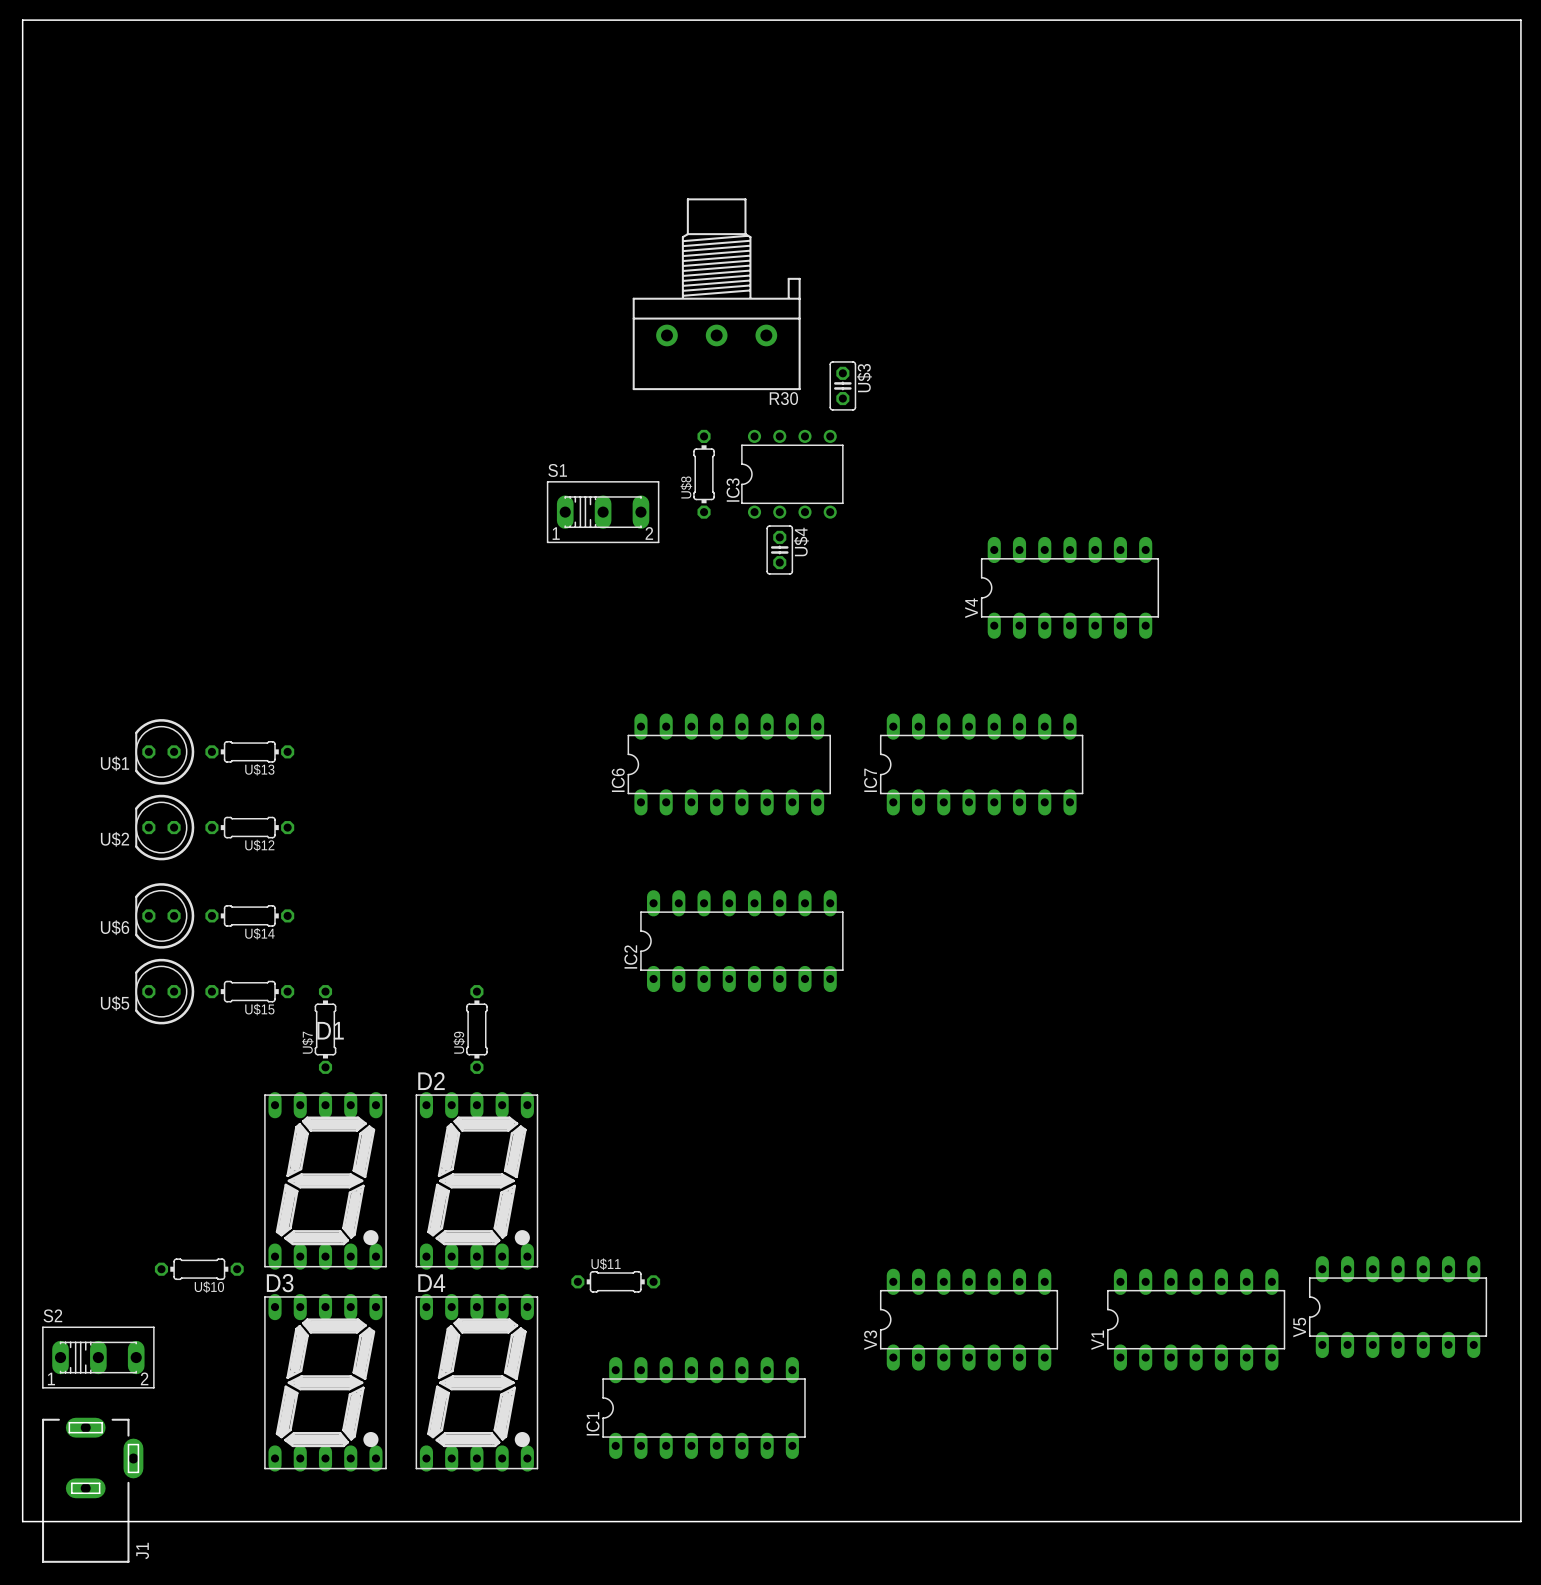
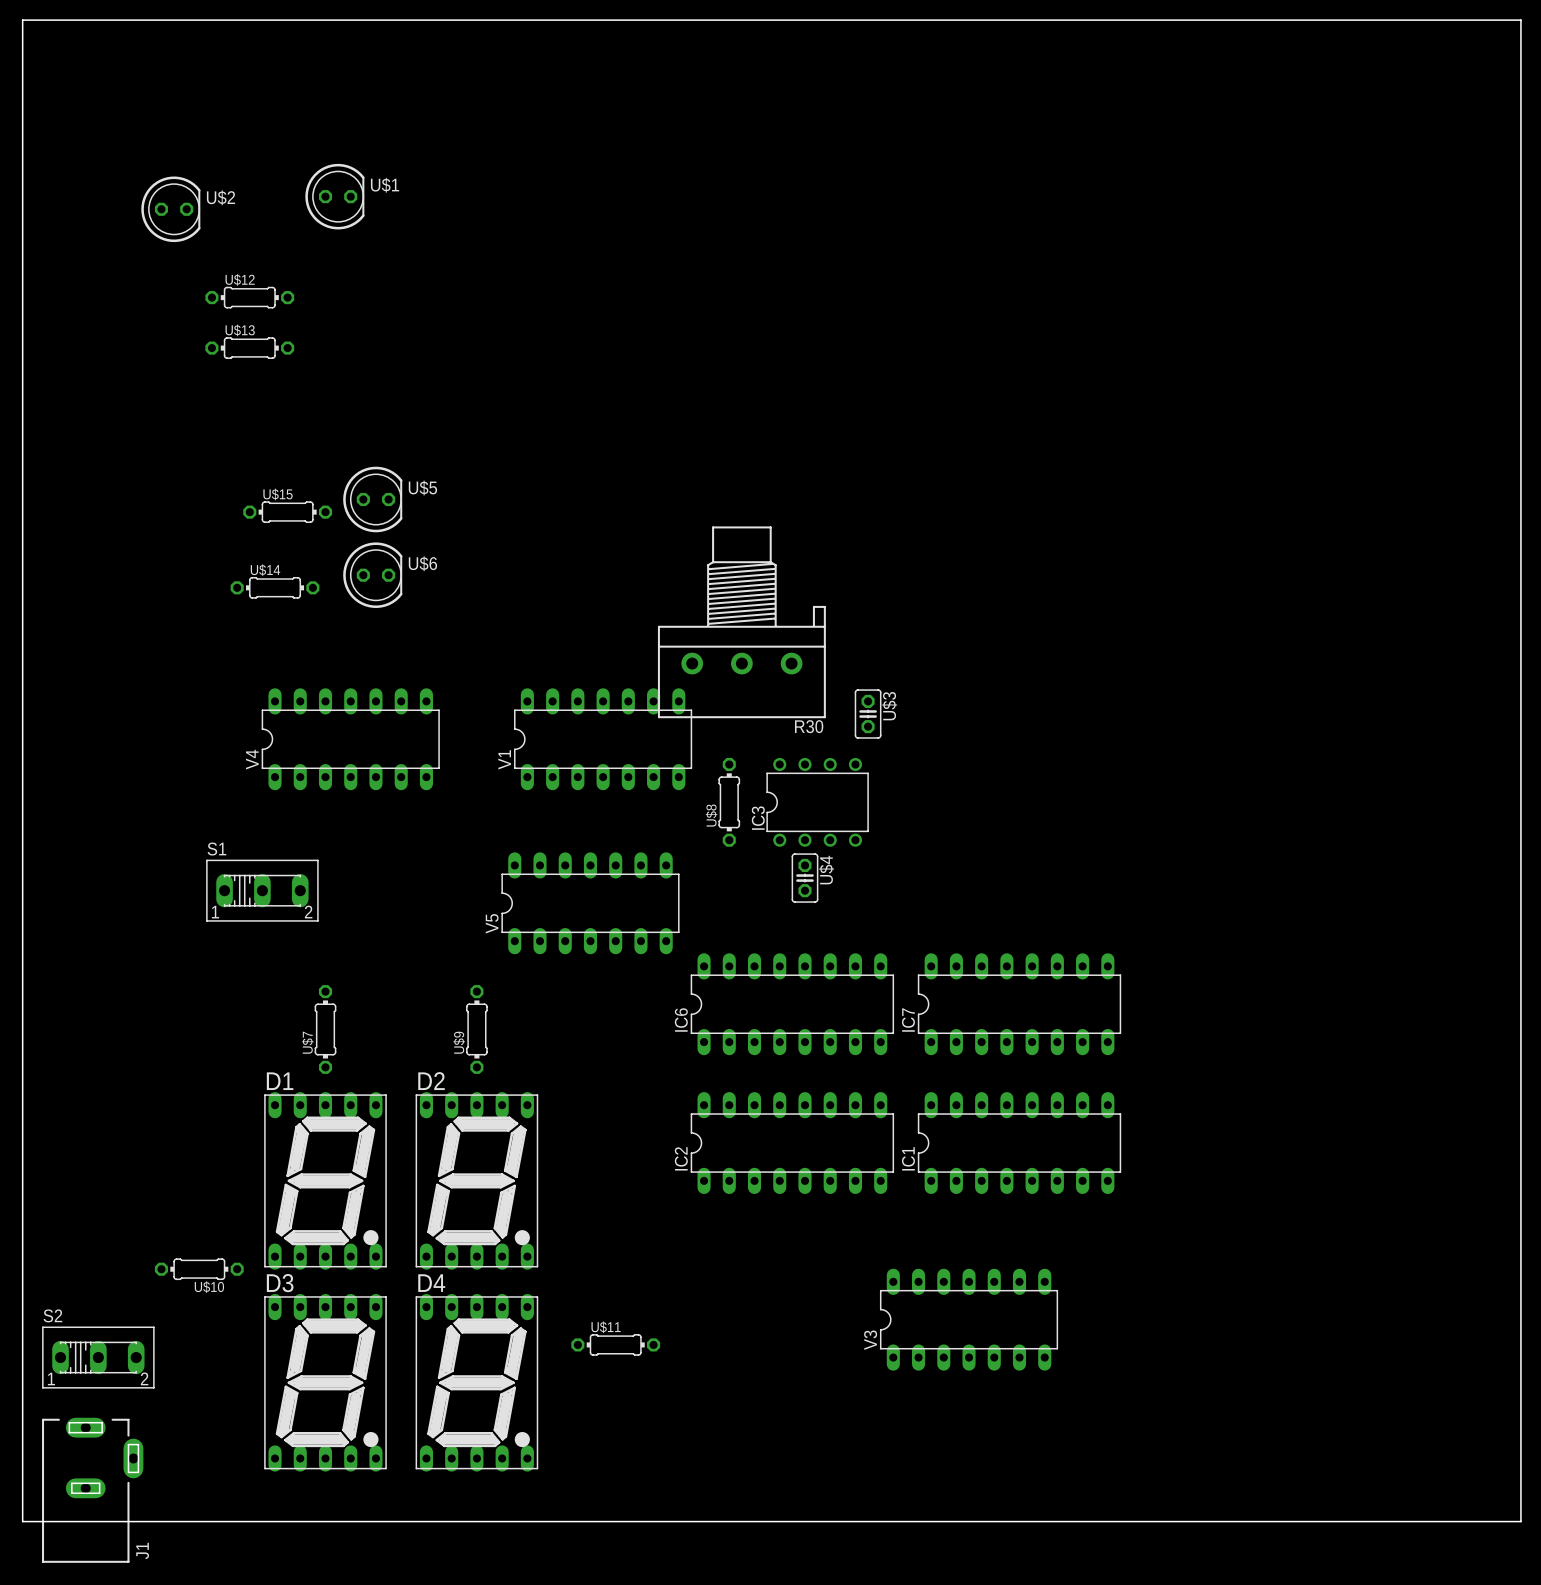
R30 position: (716, 294) -> (741, 622)
U$3 position: (842, 385) -> (868, 714)
U$8 position: (704, 474) -> (729, 802)
IC3 position: (792, 474) -> (817, 802)
S1 position: (603, 512) -> (262, 890)
U$4 position: (779, 549) -> (804, 878)
V4 position: (1069, 587) -> (350, 739)
U$1 rotation: 0° (164, 751) -> 180° (334, 196)
U$1 position: (164, 751) -> (334, 196)
U$13 position: (249, 751) -> (249, 348)
IC6 position: (729, 764) -> (792, 1004)
IC7 position: (981, 764) -> (1019, 1004)
U$13 name position: U$13 (259, 769) -> U$13 (240, 330)
U$2 rotation: 0° (164, 827) -> 180° (170, 209)
U$2 position: (164, 827) -> (170, 209)
U$12 position: (249, 827) -> (249, 297)
U$12 name position: U$12 (259, 845) -> U$12 (240, 279)
U$6 rotation: 0° (164, 915) -> 180° (372, 575)
U$6 position: (164, 915) -> (372, 575)
U$14 position: (249, 915) -> (275, 587)
U$14 name position: U$14 (259, 933) -> U$14 (265, 570)
IC2 position: (741, 941) -> (792, 1143)
U$5 rotation: 0° (164, 991) -> 180° (372, 499)
U$5 position: (164, 991) -> (372, 499)
U$15 position: (249, 991) -> (287, 512)
U$15 name position: U$15 (259, 1009) -> U$15 (278, 494)
D1 name position: D1 (330, 1030) -> D1 (280, 1081)
U$11 position: (615, 1281) -> (615, 1344)
V5 position: (1398, 1307) -> (590, 903)
V1 position: (1196, 1319) -> (603, 739)
IC1 position: (704, 1408) -> (1019, 1143)

